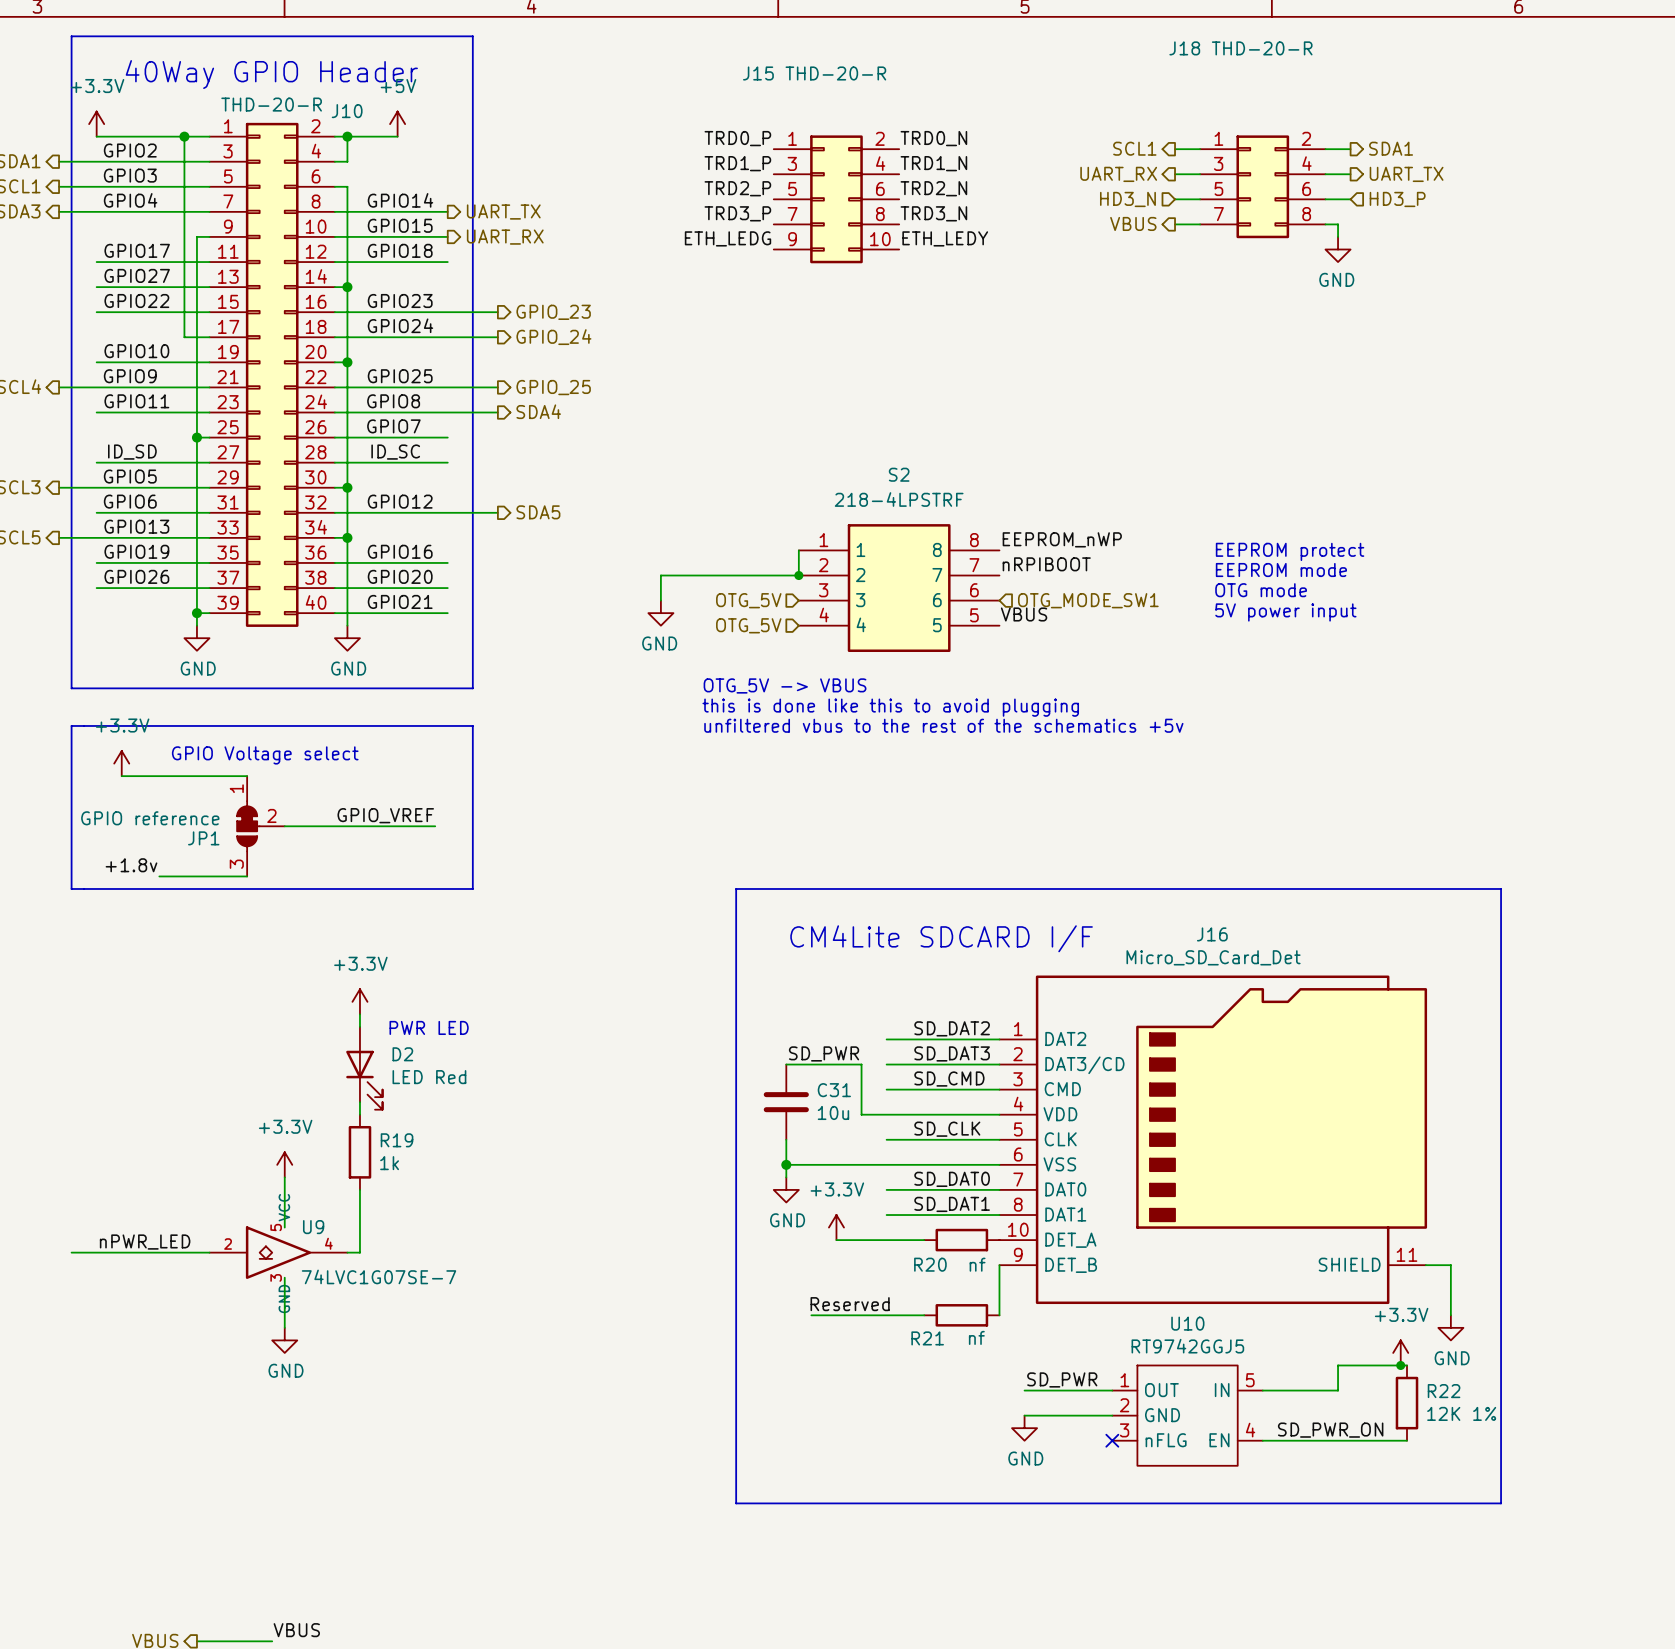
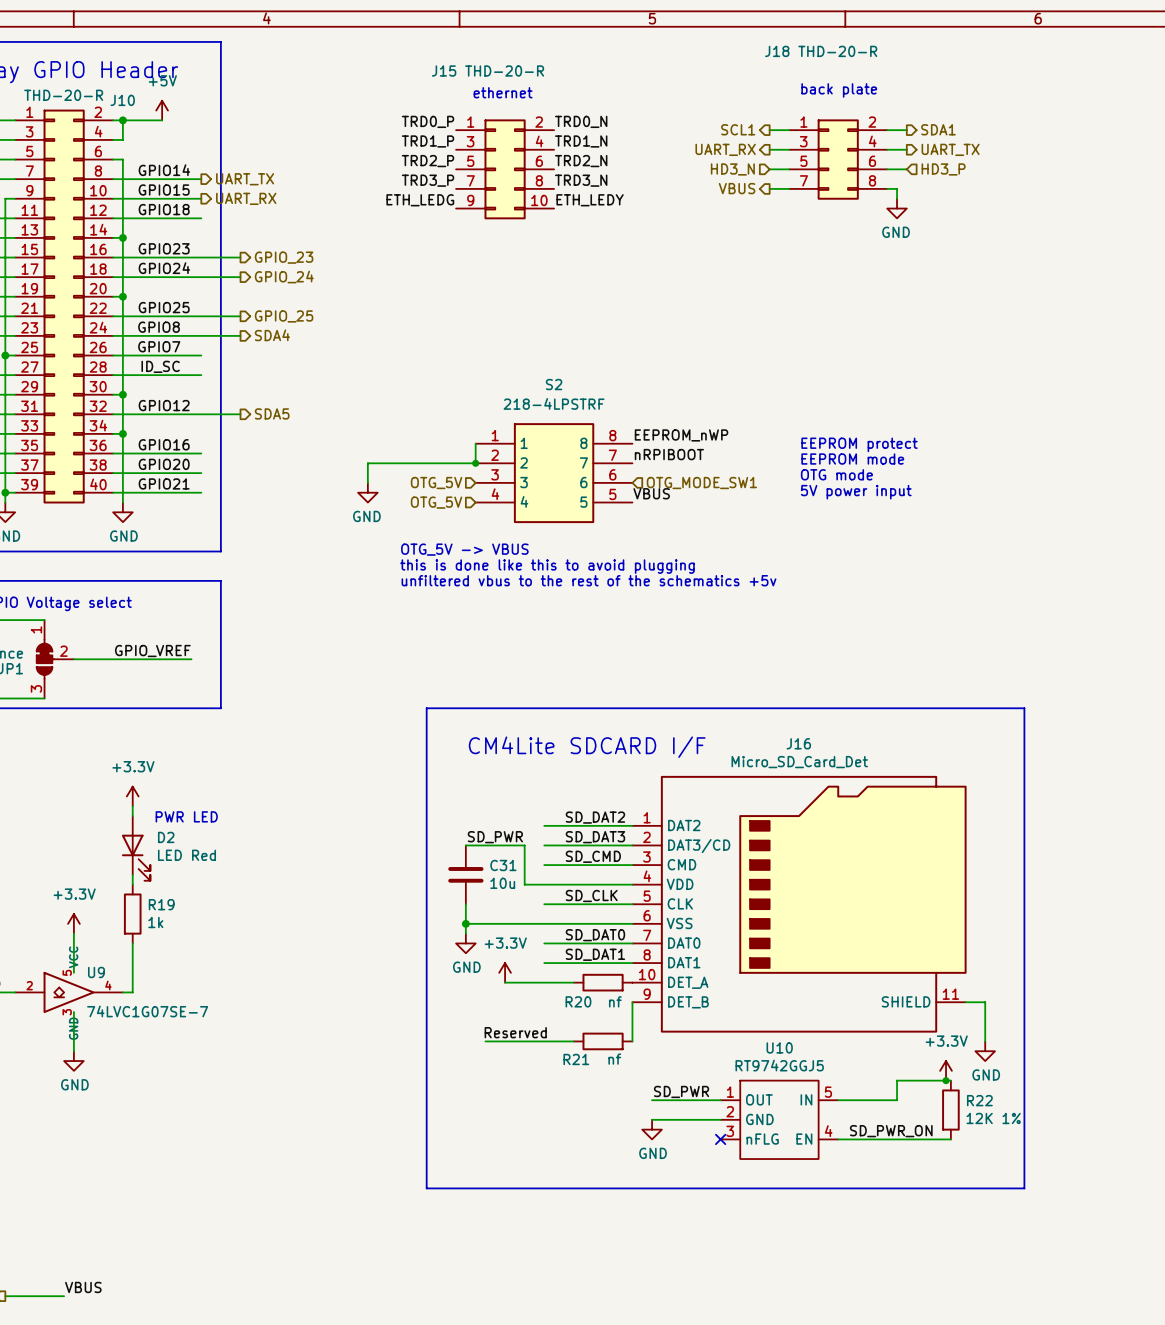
text: none -> back plate (839, 90)
text: none -> ethernet (503, 92)

